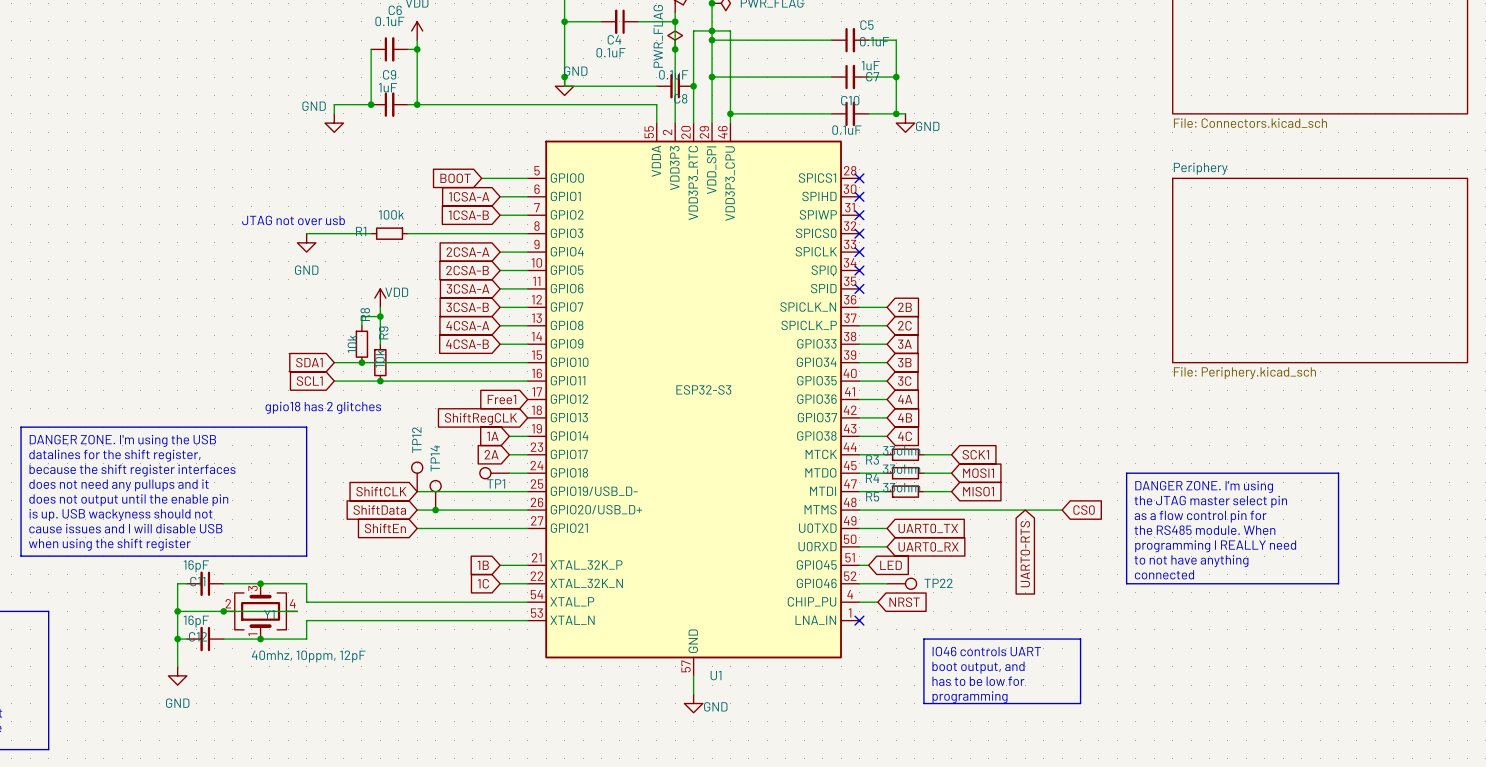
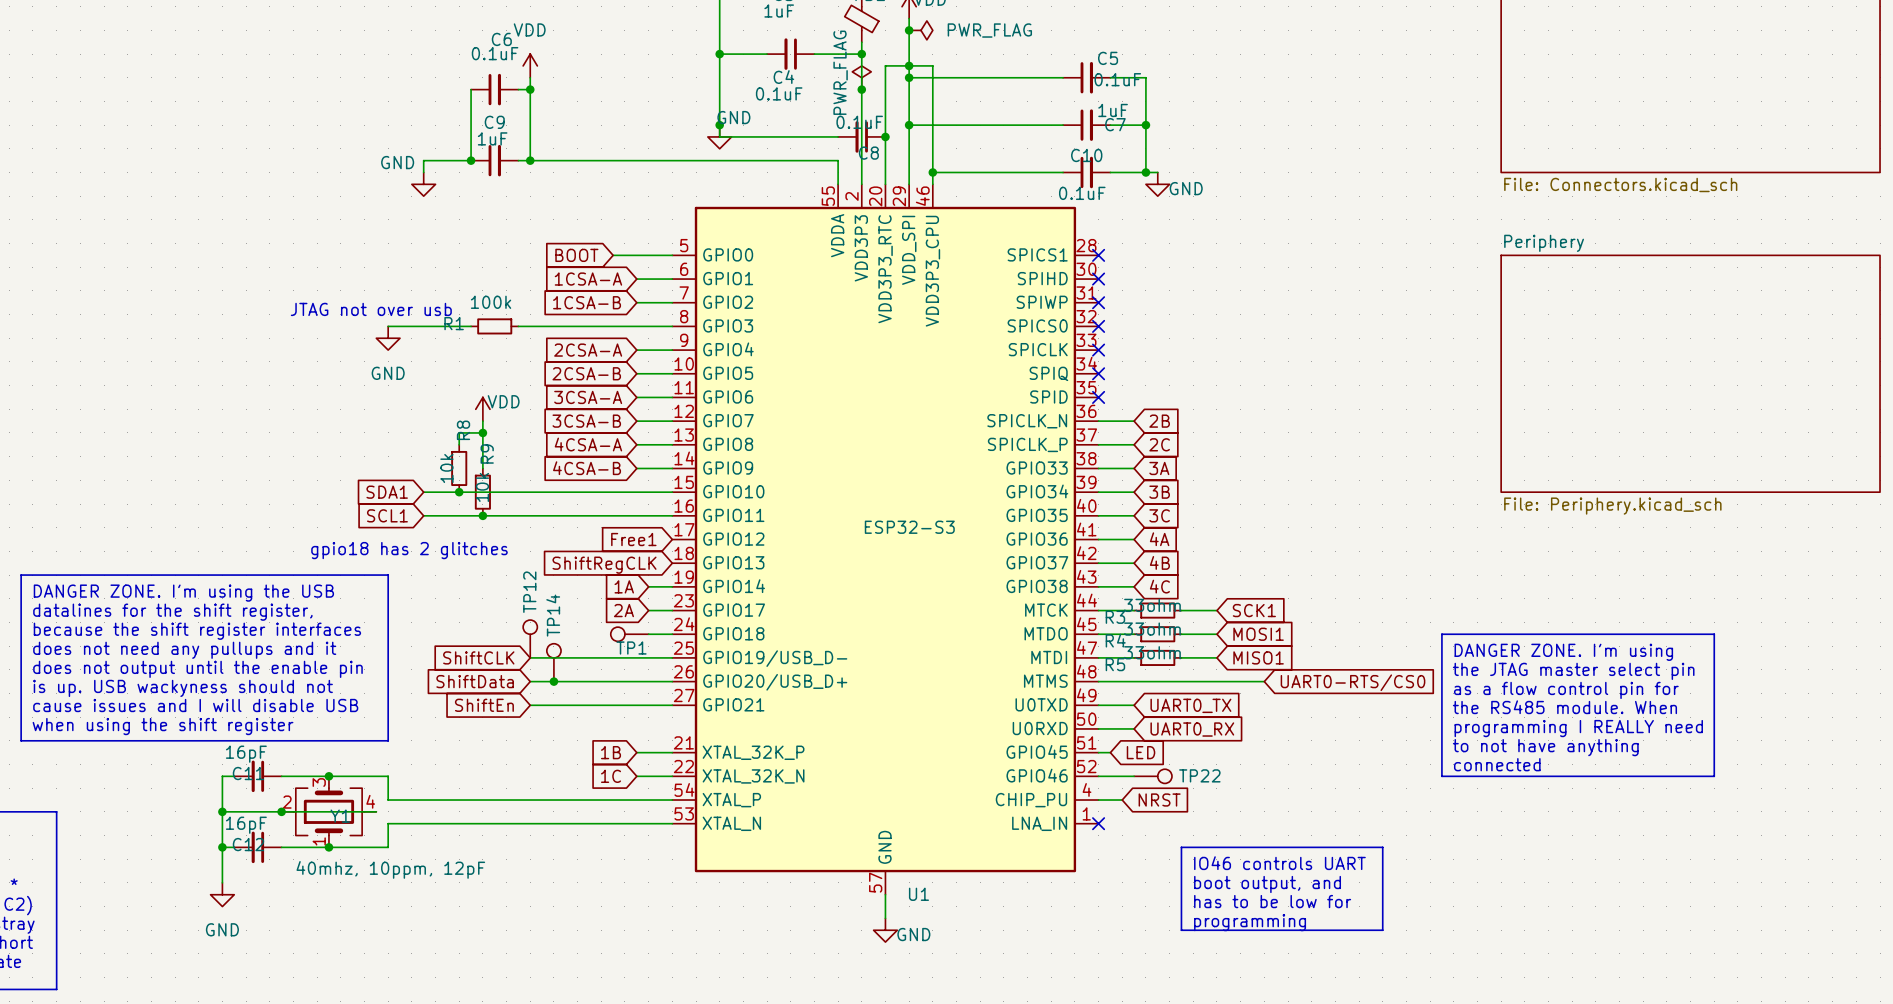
wire: (988, 510) (1062, 510) -> none
global label: CS0 (1084, 510) -> none
global label: UART0-RTS (1025, 554) -> UART0-RTS/CS0 (1353, 682)

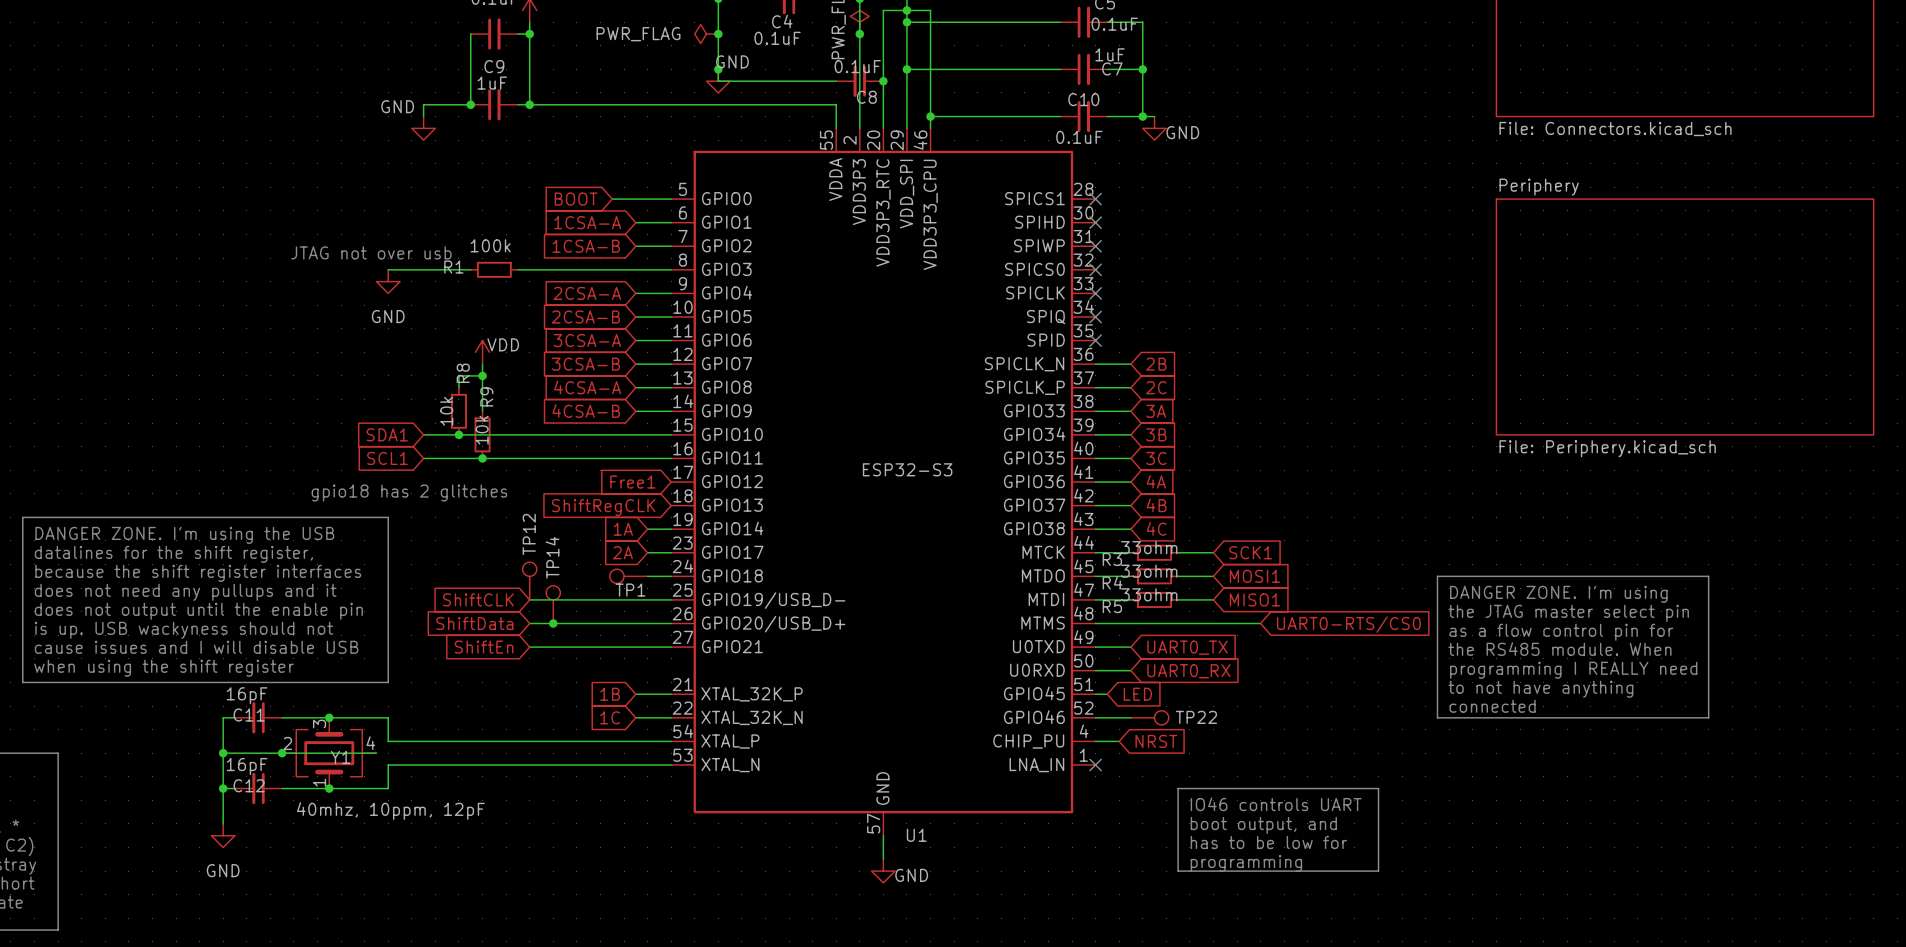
power symbol: none -> PWR_FLAG (706, 34)
junction: none -> (718, 34)

